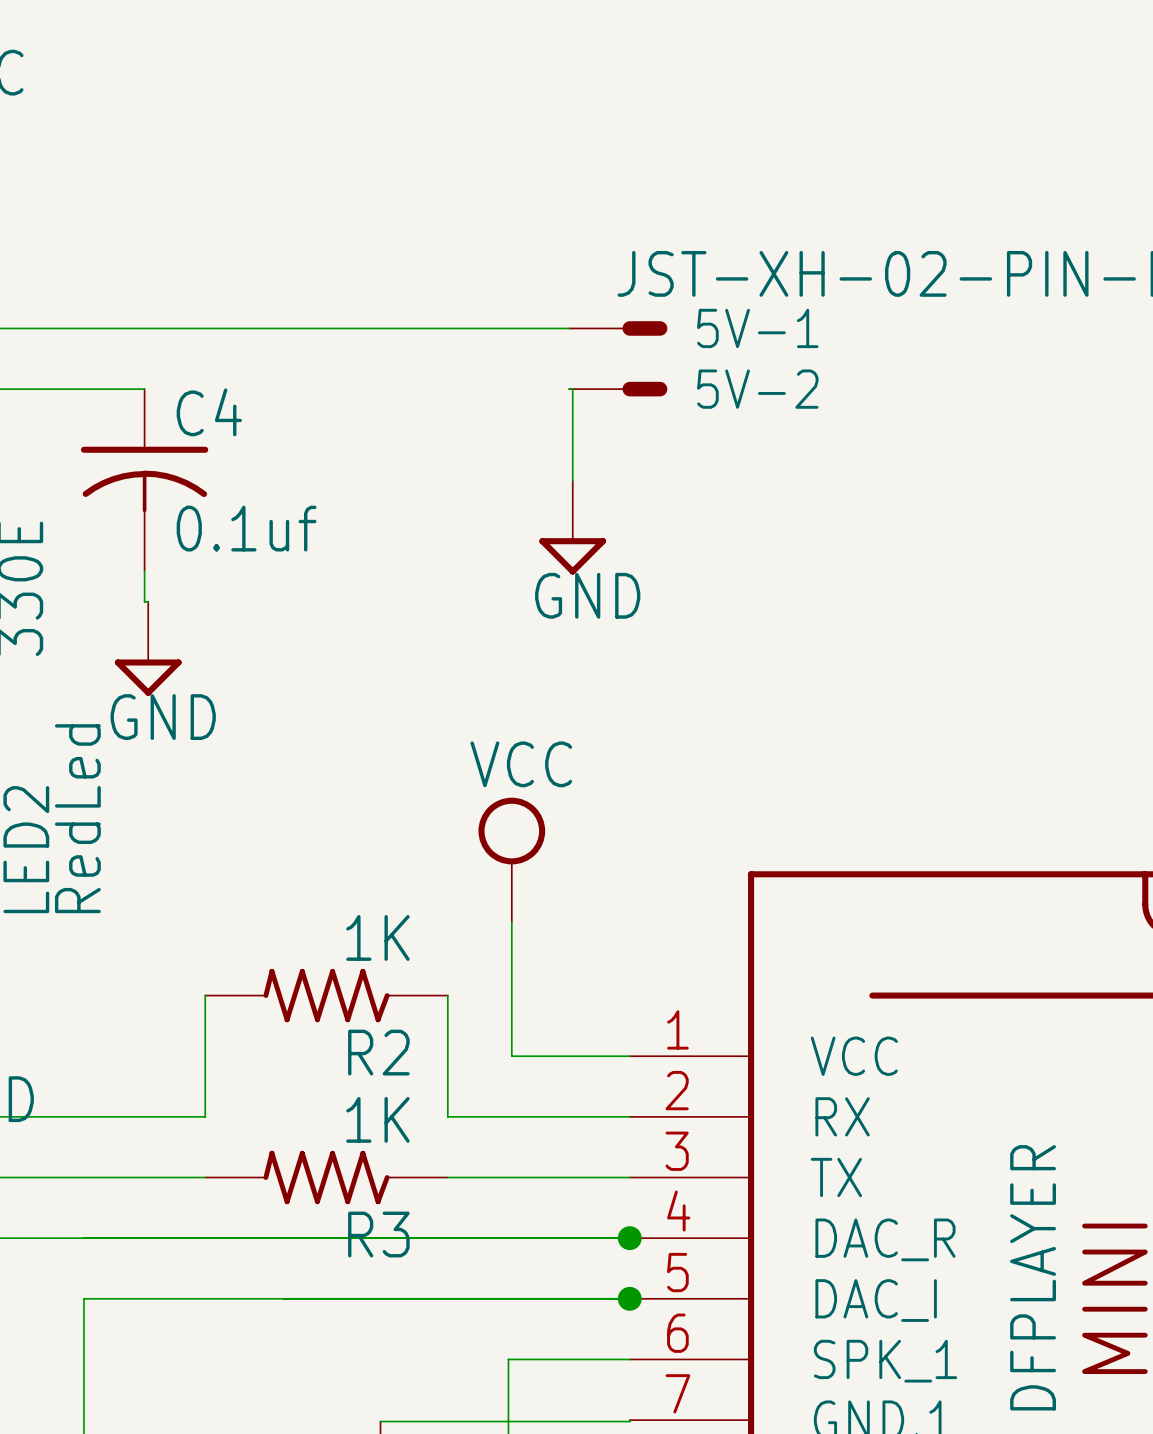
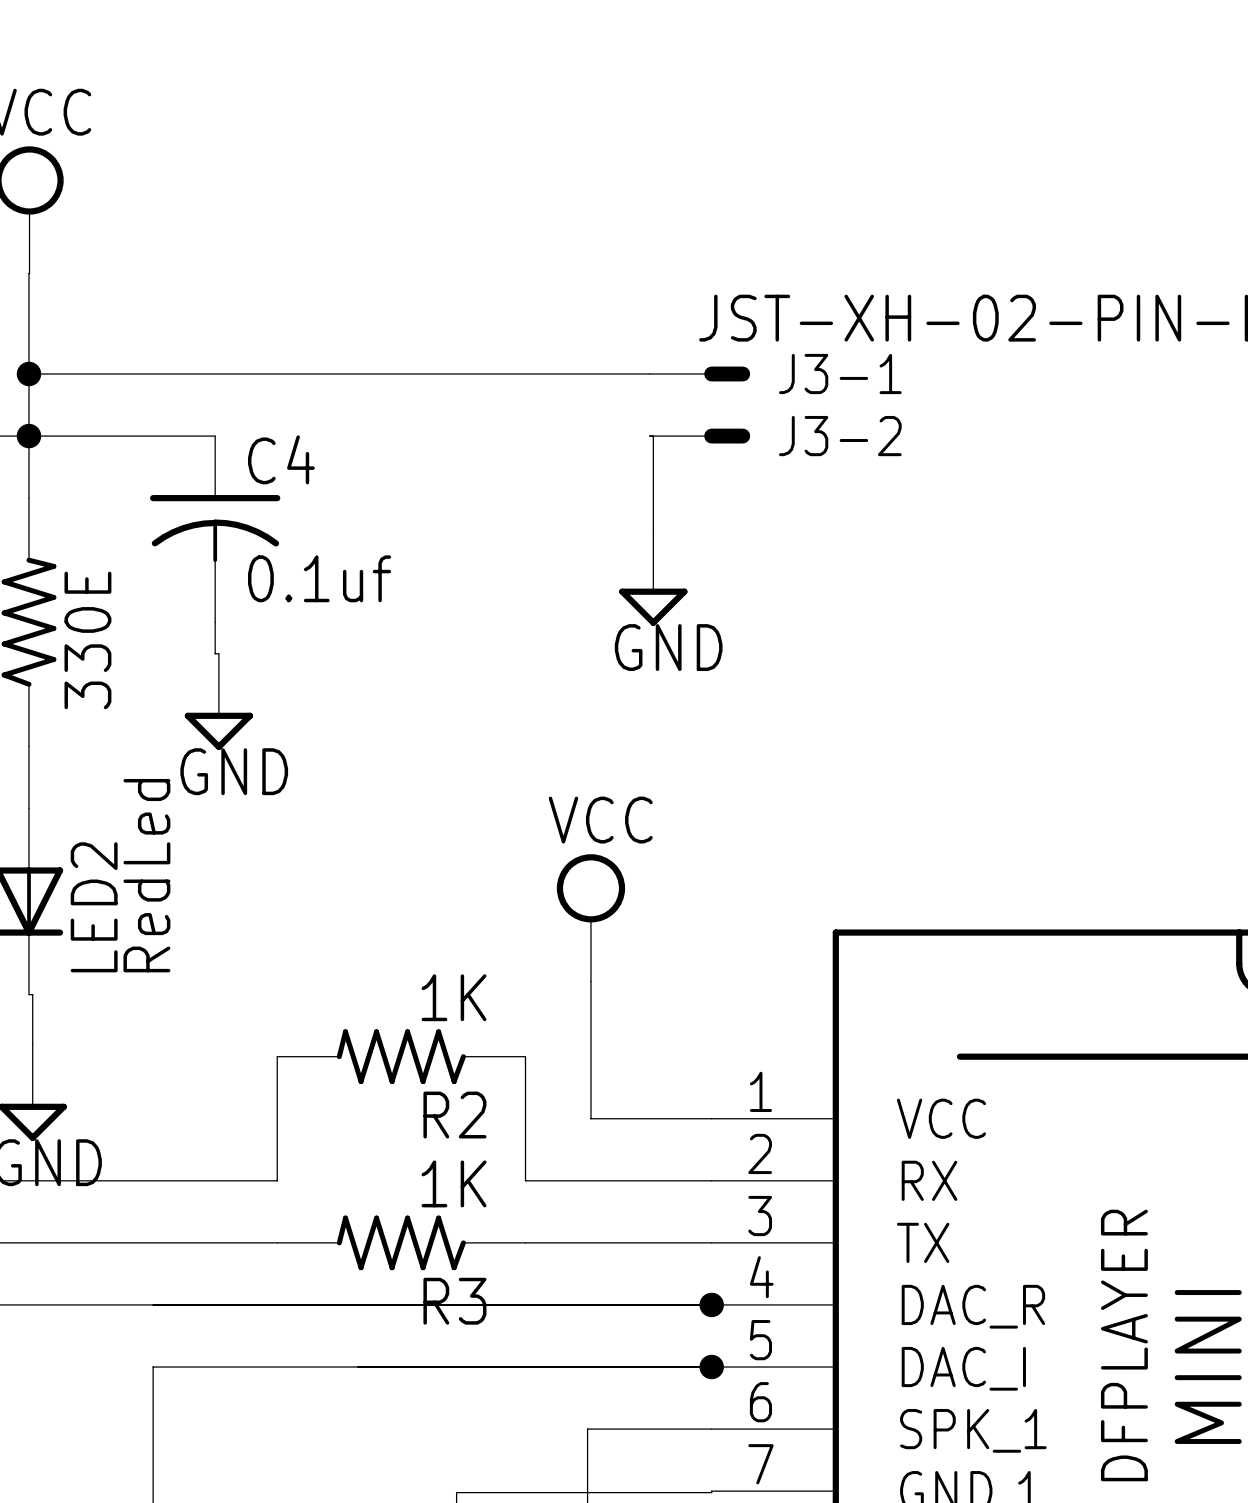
5V-1 name: 5V-1 (757, 328) -> J3-1 (840, 373)
5V-2 name: 5V-2 (757, 389) -> J3-2 (840, 436)

